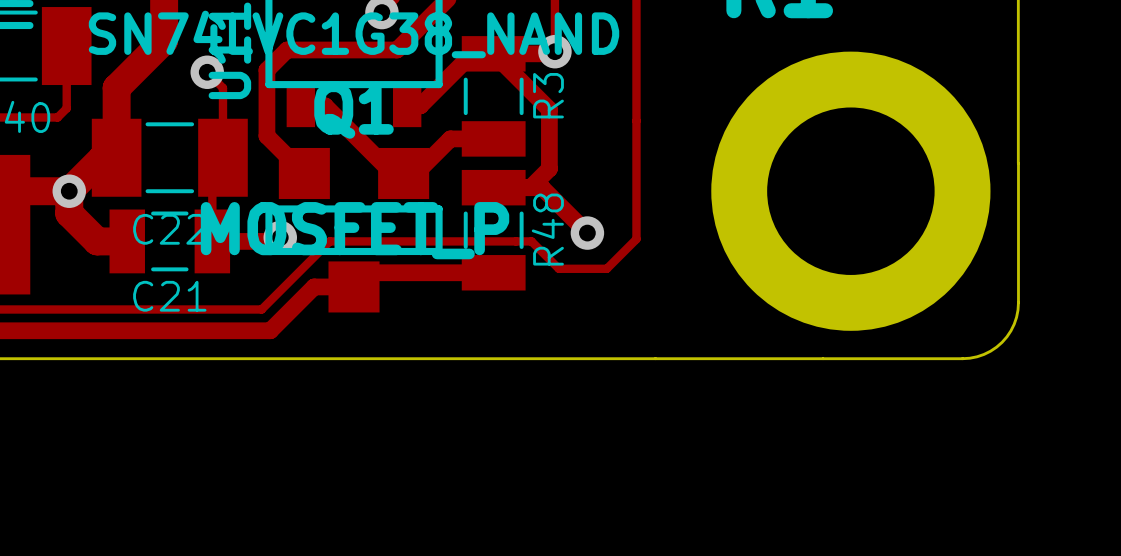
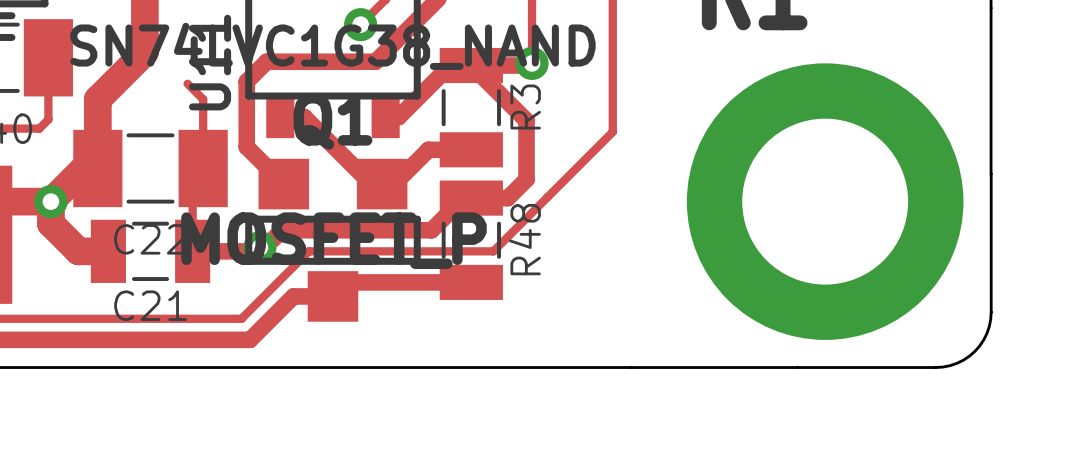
via: (207, 72) -> none
track: (636, 120) (636, 239) (606, 268) (558, 268) (531, 241) (515, 241) -> (612, 131) (493, 251)
track: none -> (471, 198) (463, 198) (431, 230) (282, 230) (272, 240)
track: (530, 187) (542, 187) (587, 233) -> none
via: (587, 233) -> none

